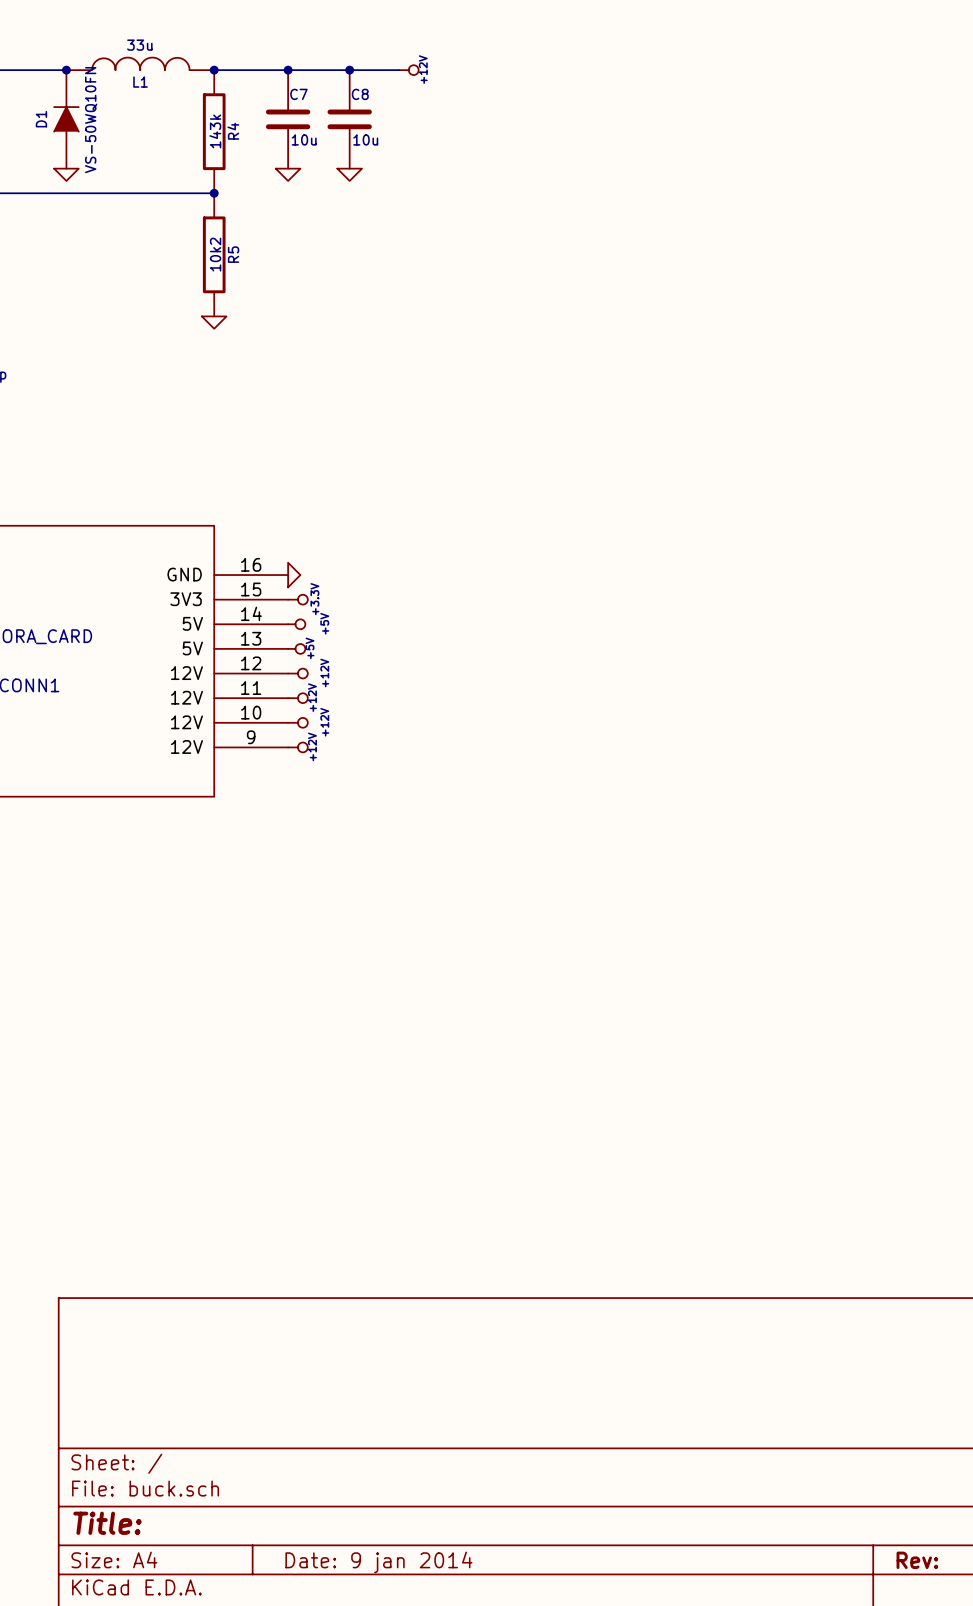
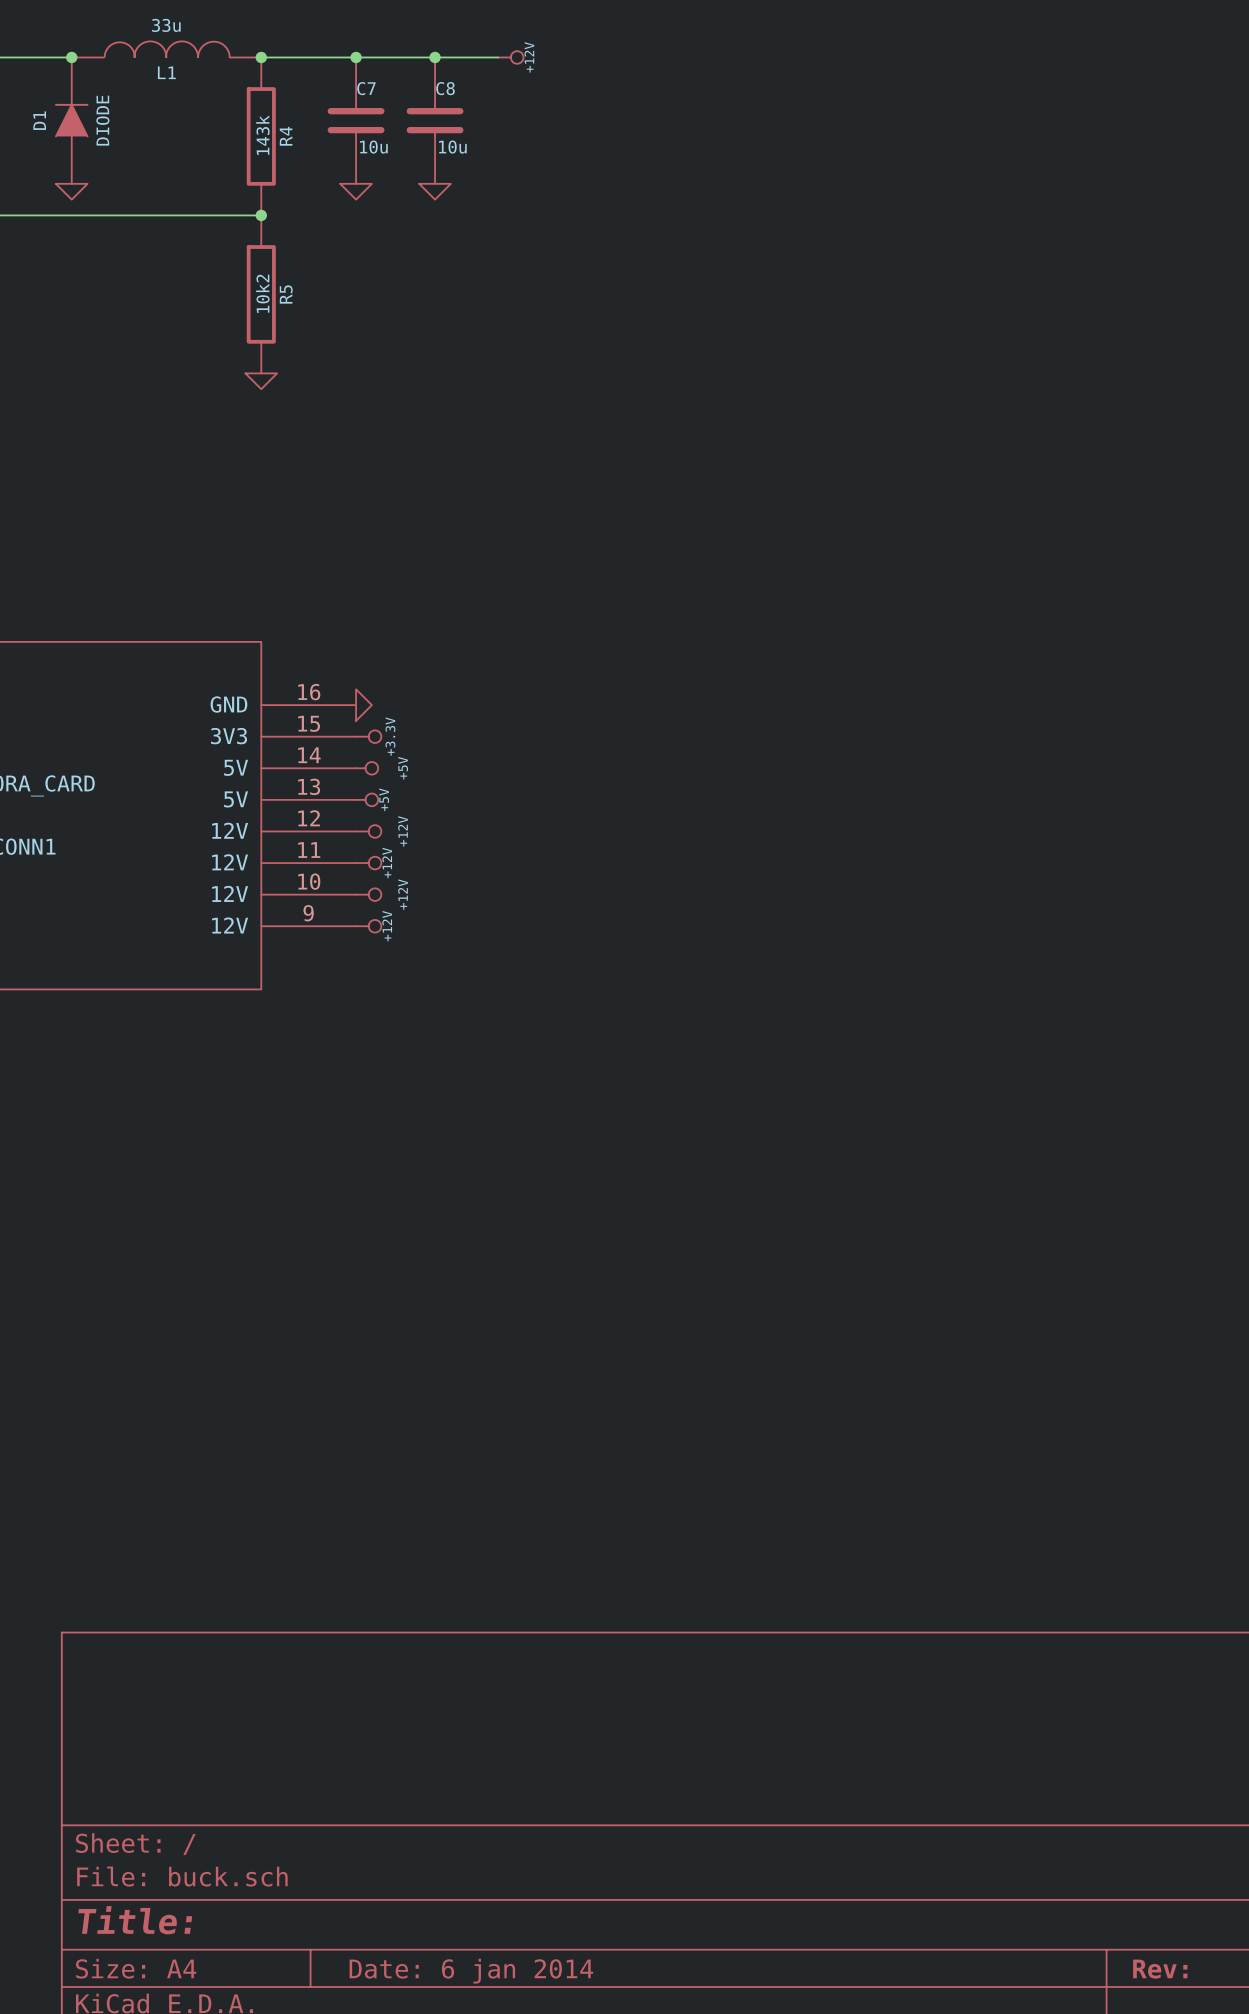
D1 value: VS-50WQ10FN (91, 120) -> DIODE (102, 120)
title block: Date: 9 jan 2014 (378, 1562) -> Date: 6 jan 2014 (471, 1971)

